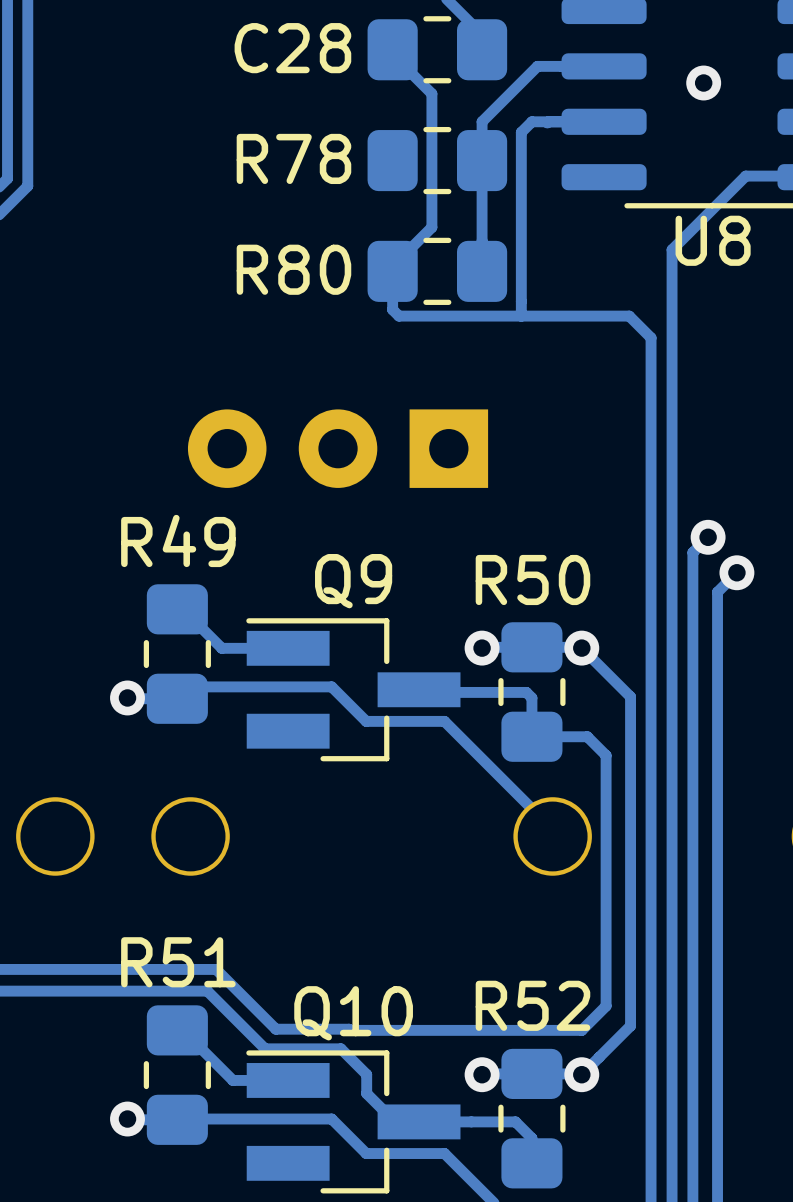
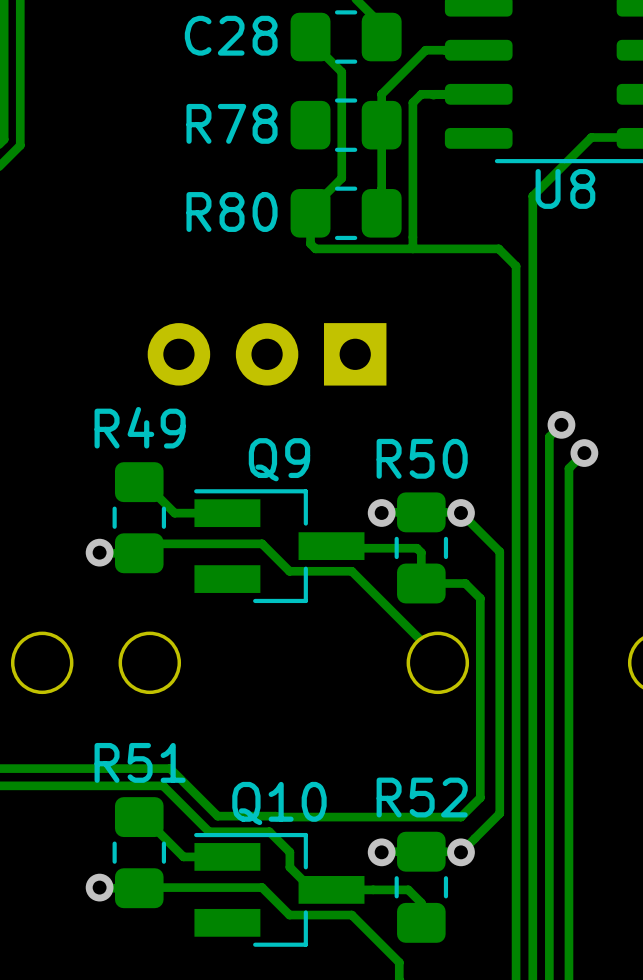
via: (703, 83) -> none

